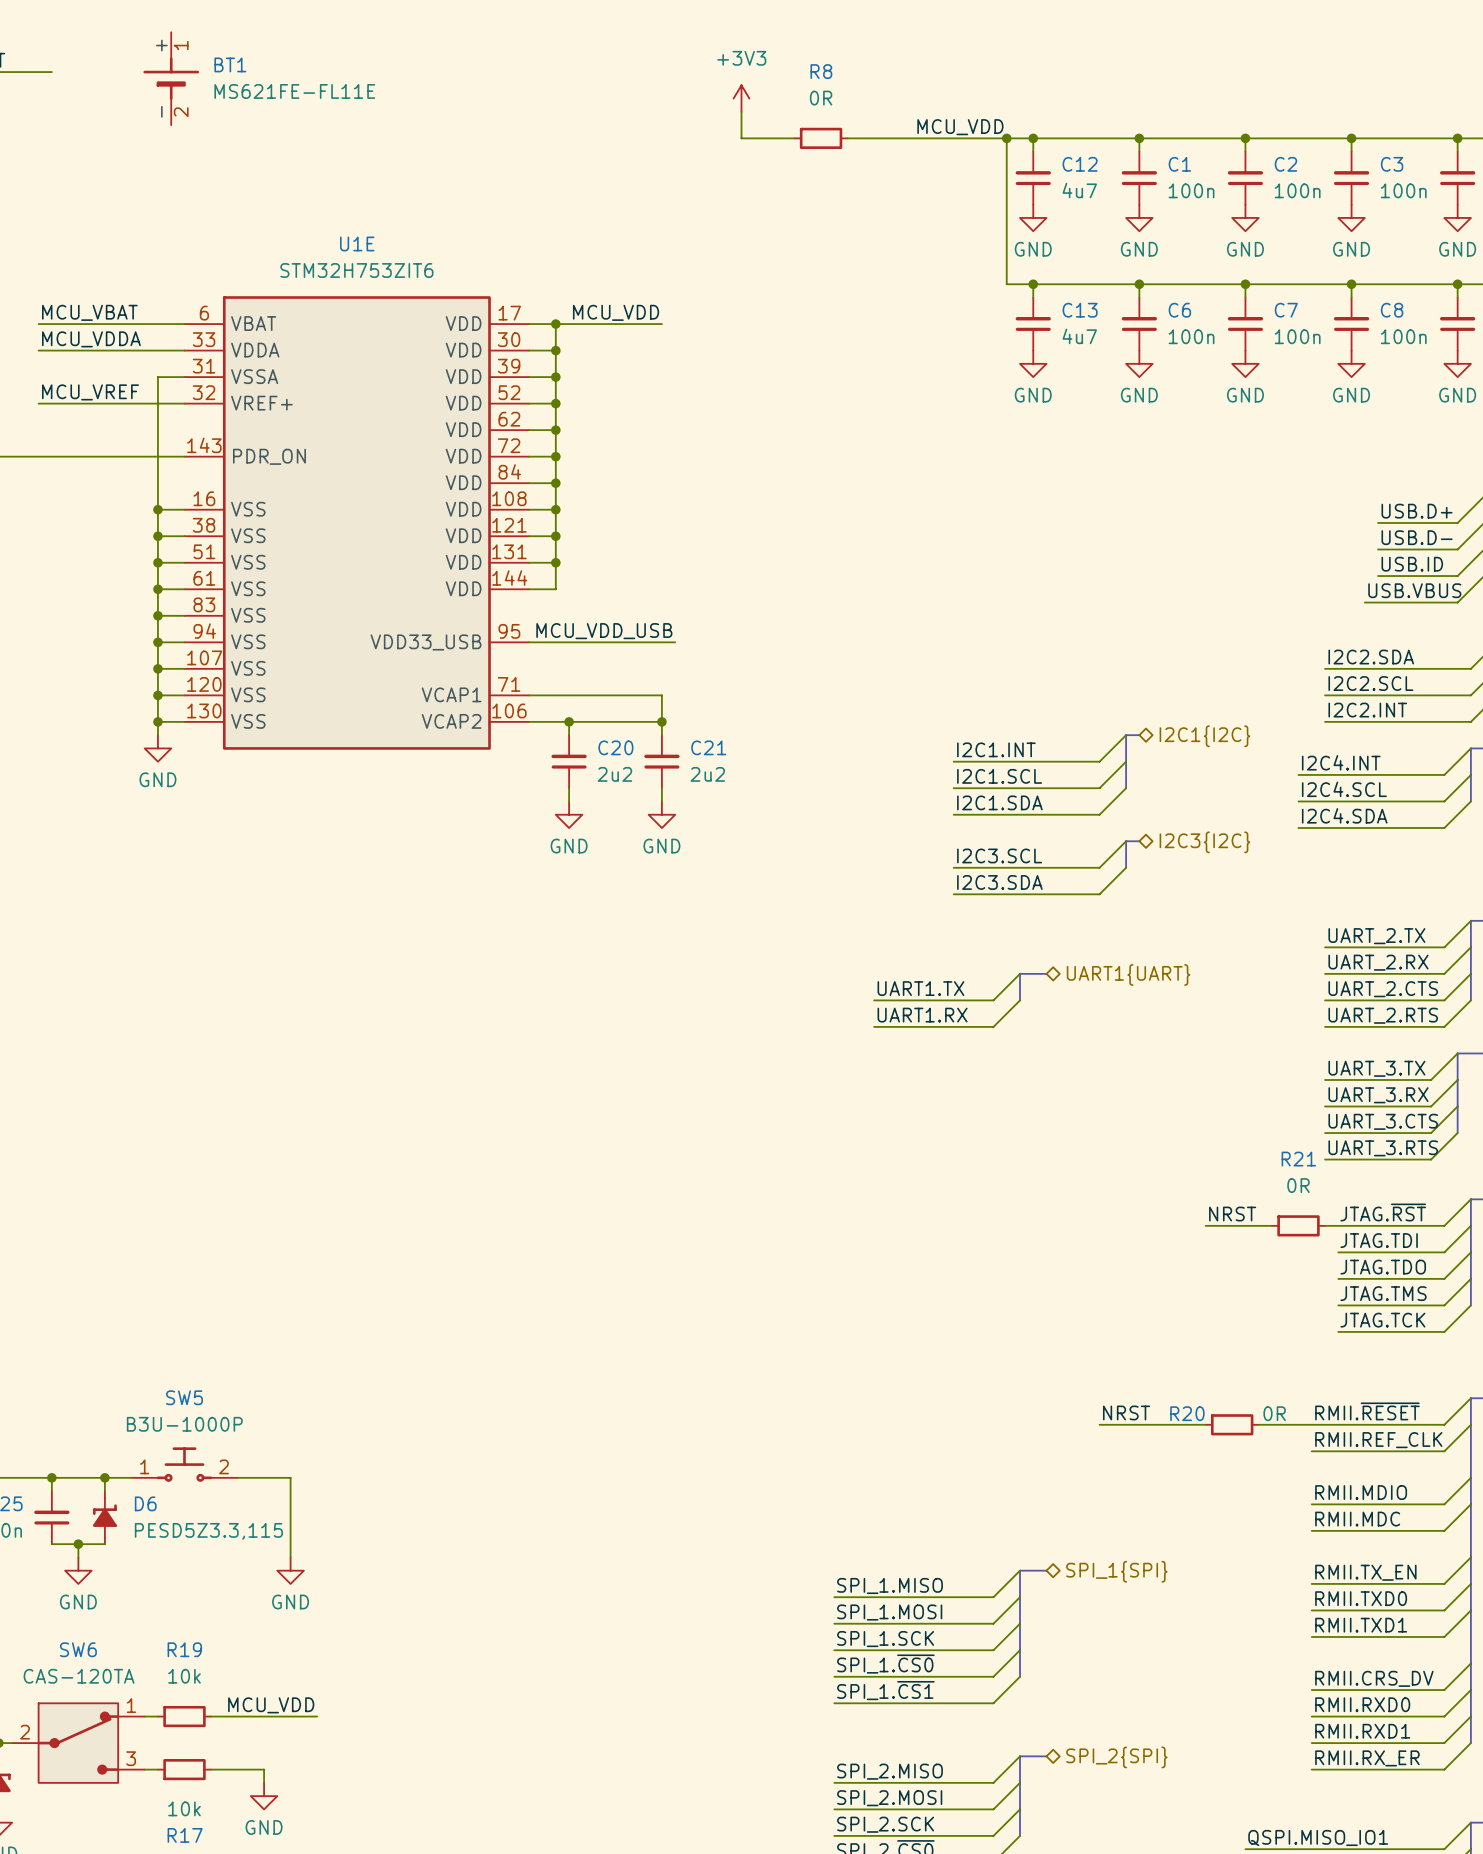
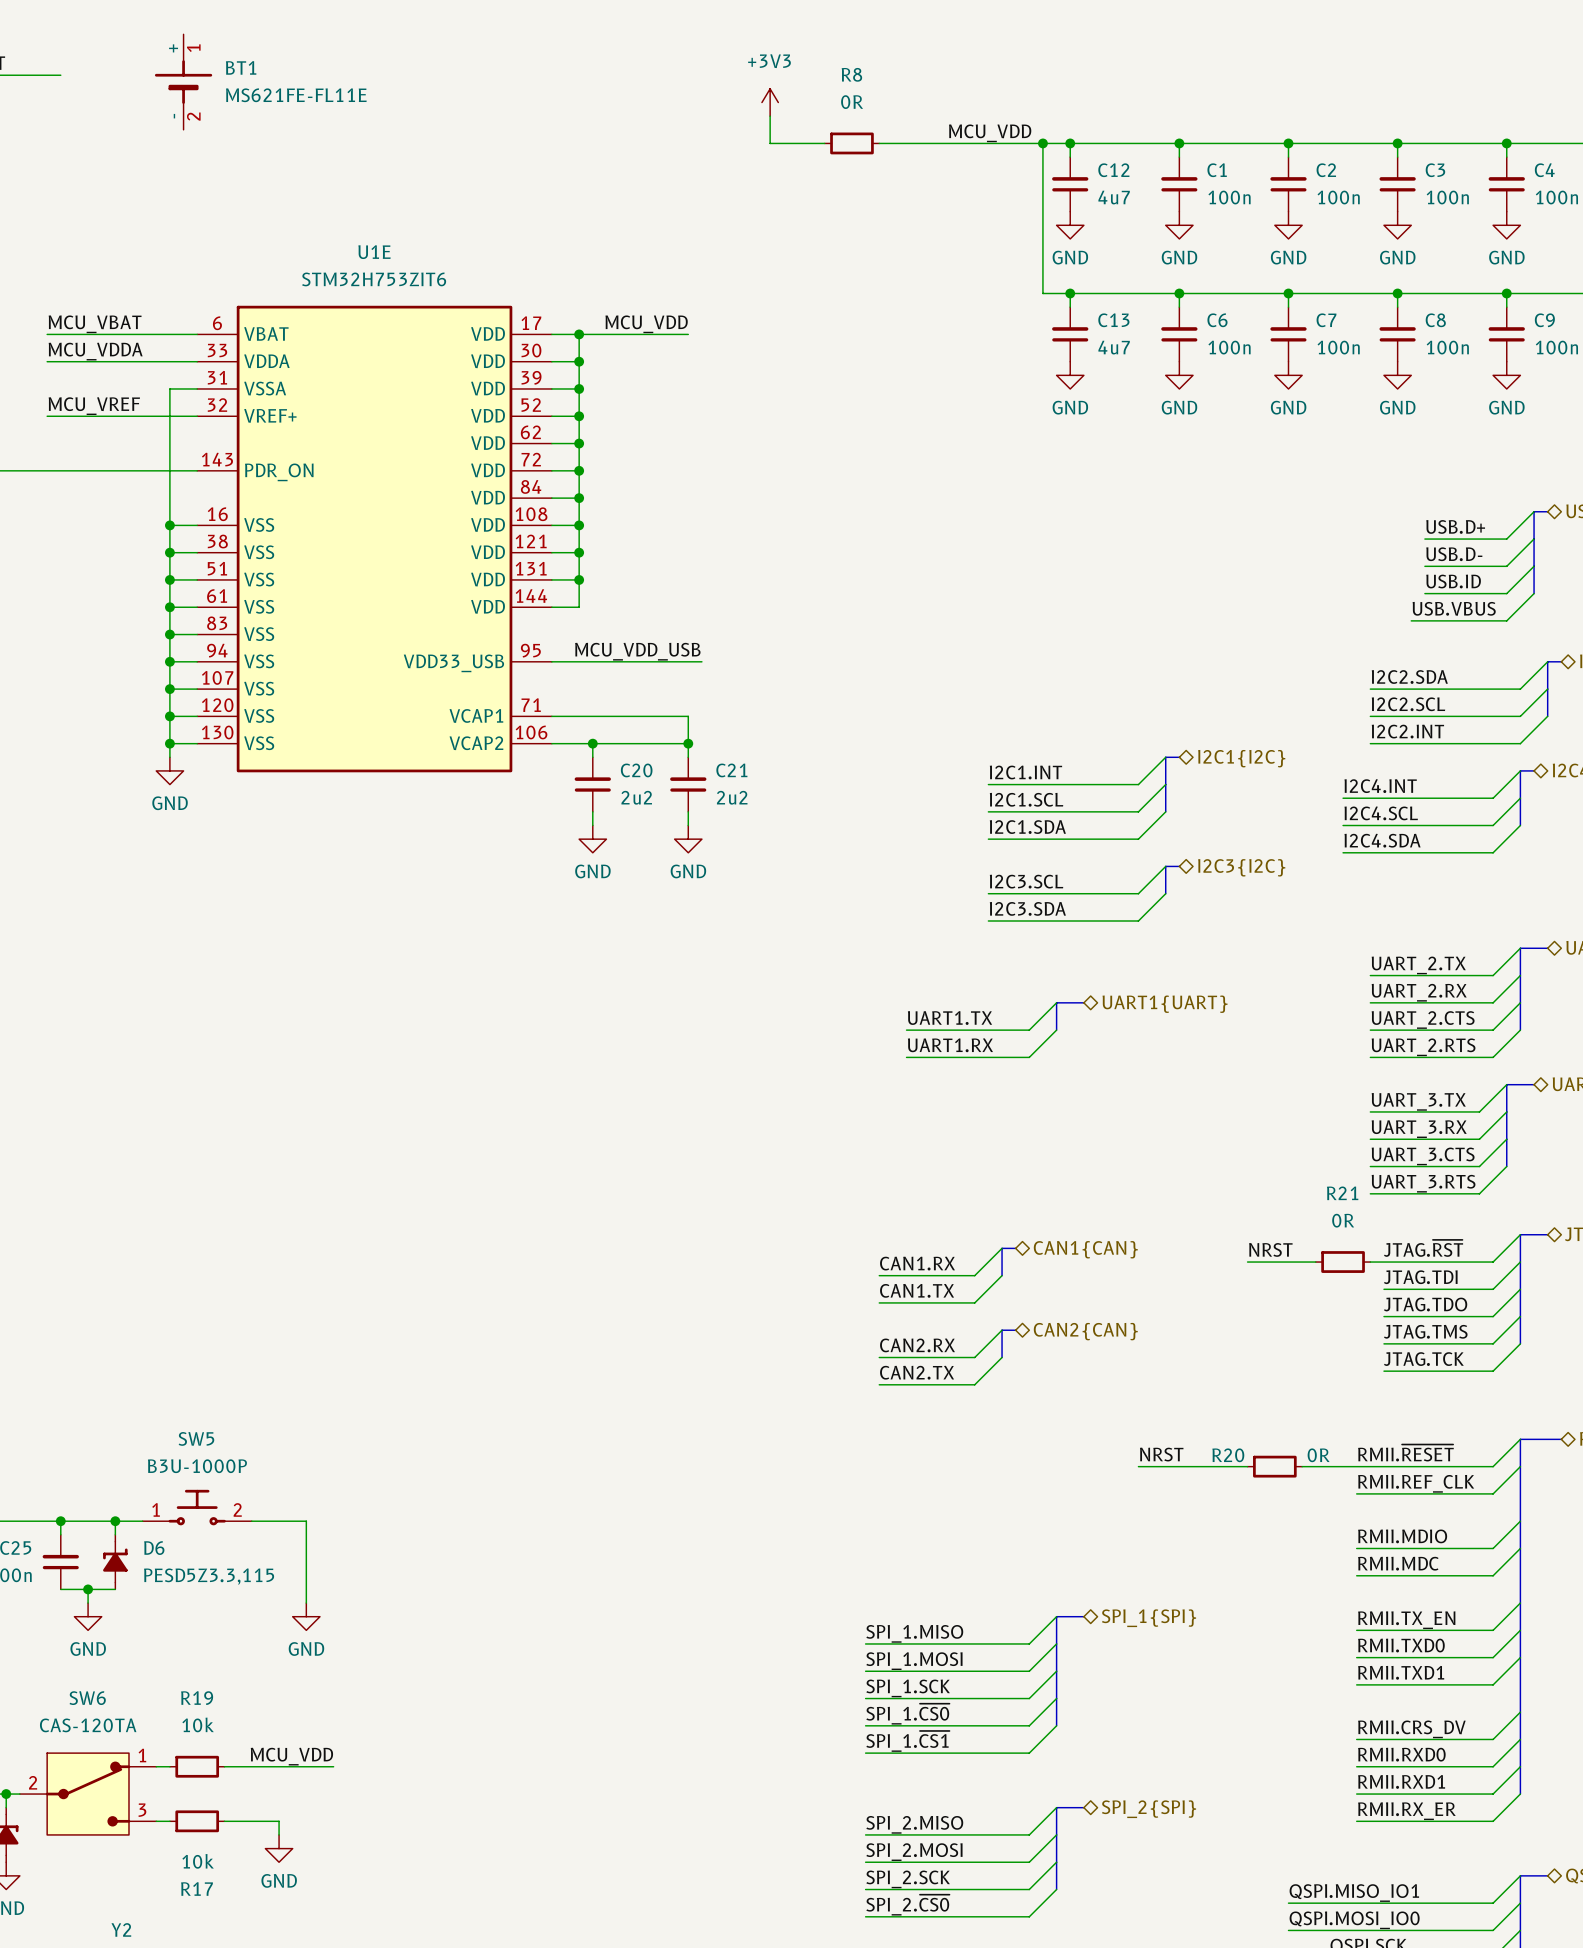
wire: none -> (1002, 1248) (974, 1275) (879, 1275)
bus: none -> (1015, 1248) (1002, 1248) (1002, 1275)
hierarchical label: none -> CAN1{CAN} (1085, 1249)
label: none -> CAN1.RX (917, 1263)
wire: none -> (1002, 1275) (974, 1302) (879, 1302)
label: none -> CAN1.TX (917, 1290)
wire: none -> (1002, 1330) (974, 1357) (879, 1357)
bus: none -> (1015, 1330) (1002, 1330) (1002, 1357)
hierarchical label: none -> CAN2{CAN} (1085, 1331)
label: none -> CAN2.RX (917, 1345)
wire: none -> (1002, 1357) (974, 1384) (879, 1384)
label: none -> CAN2.TX (917, 1372)

